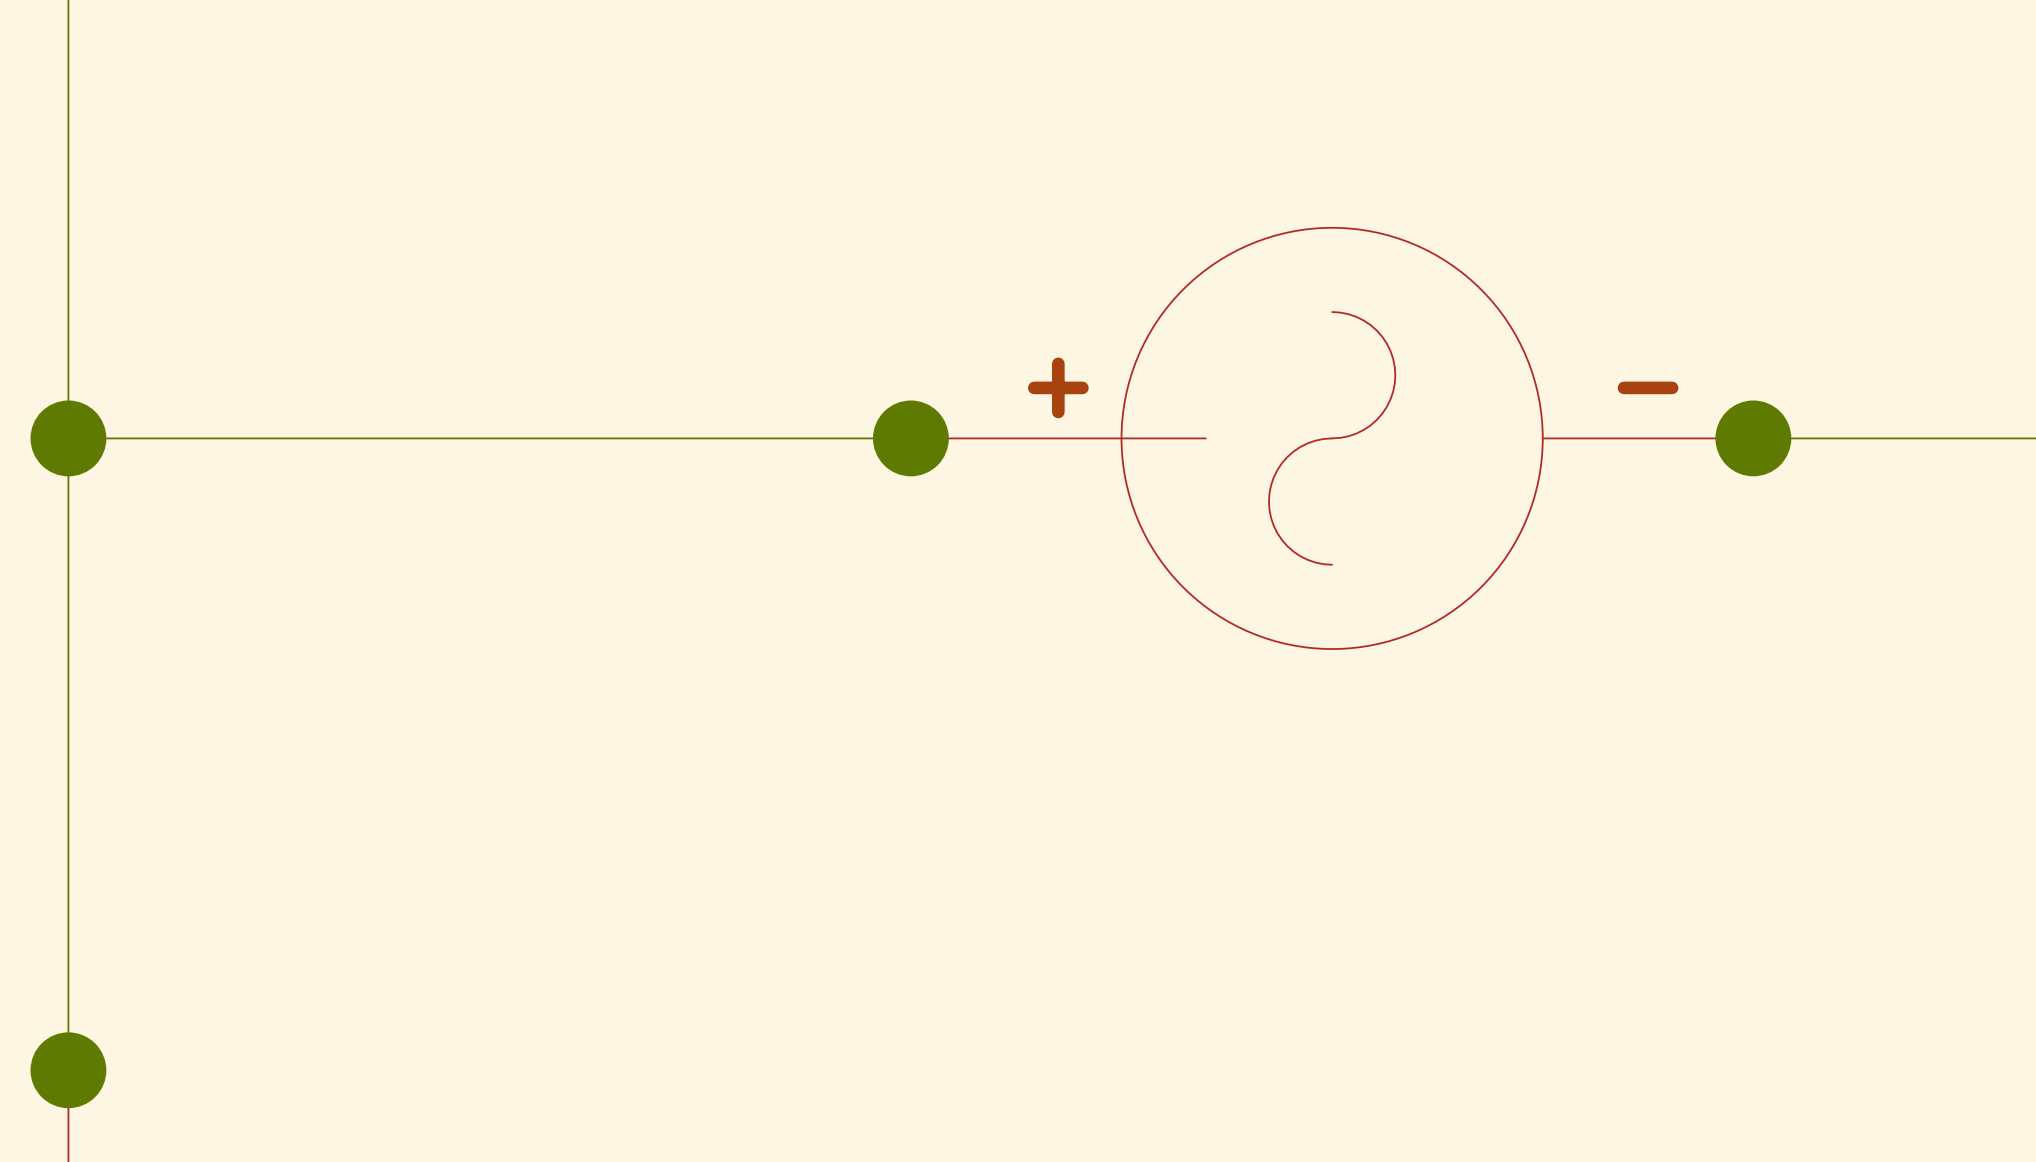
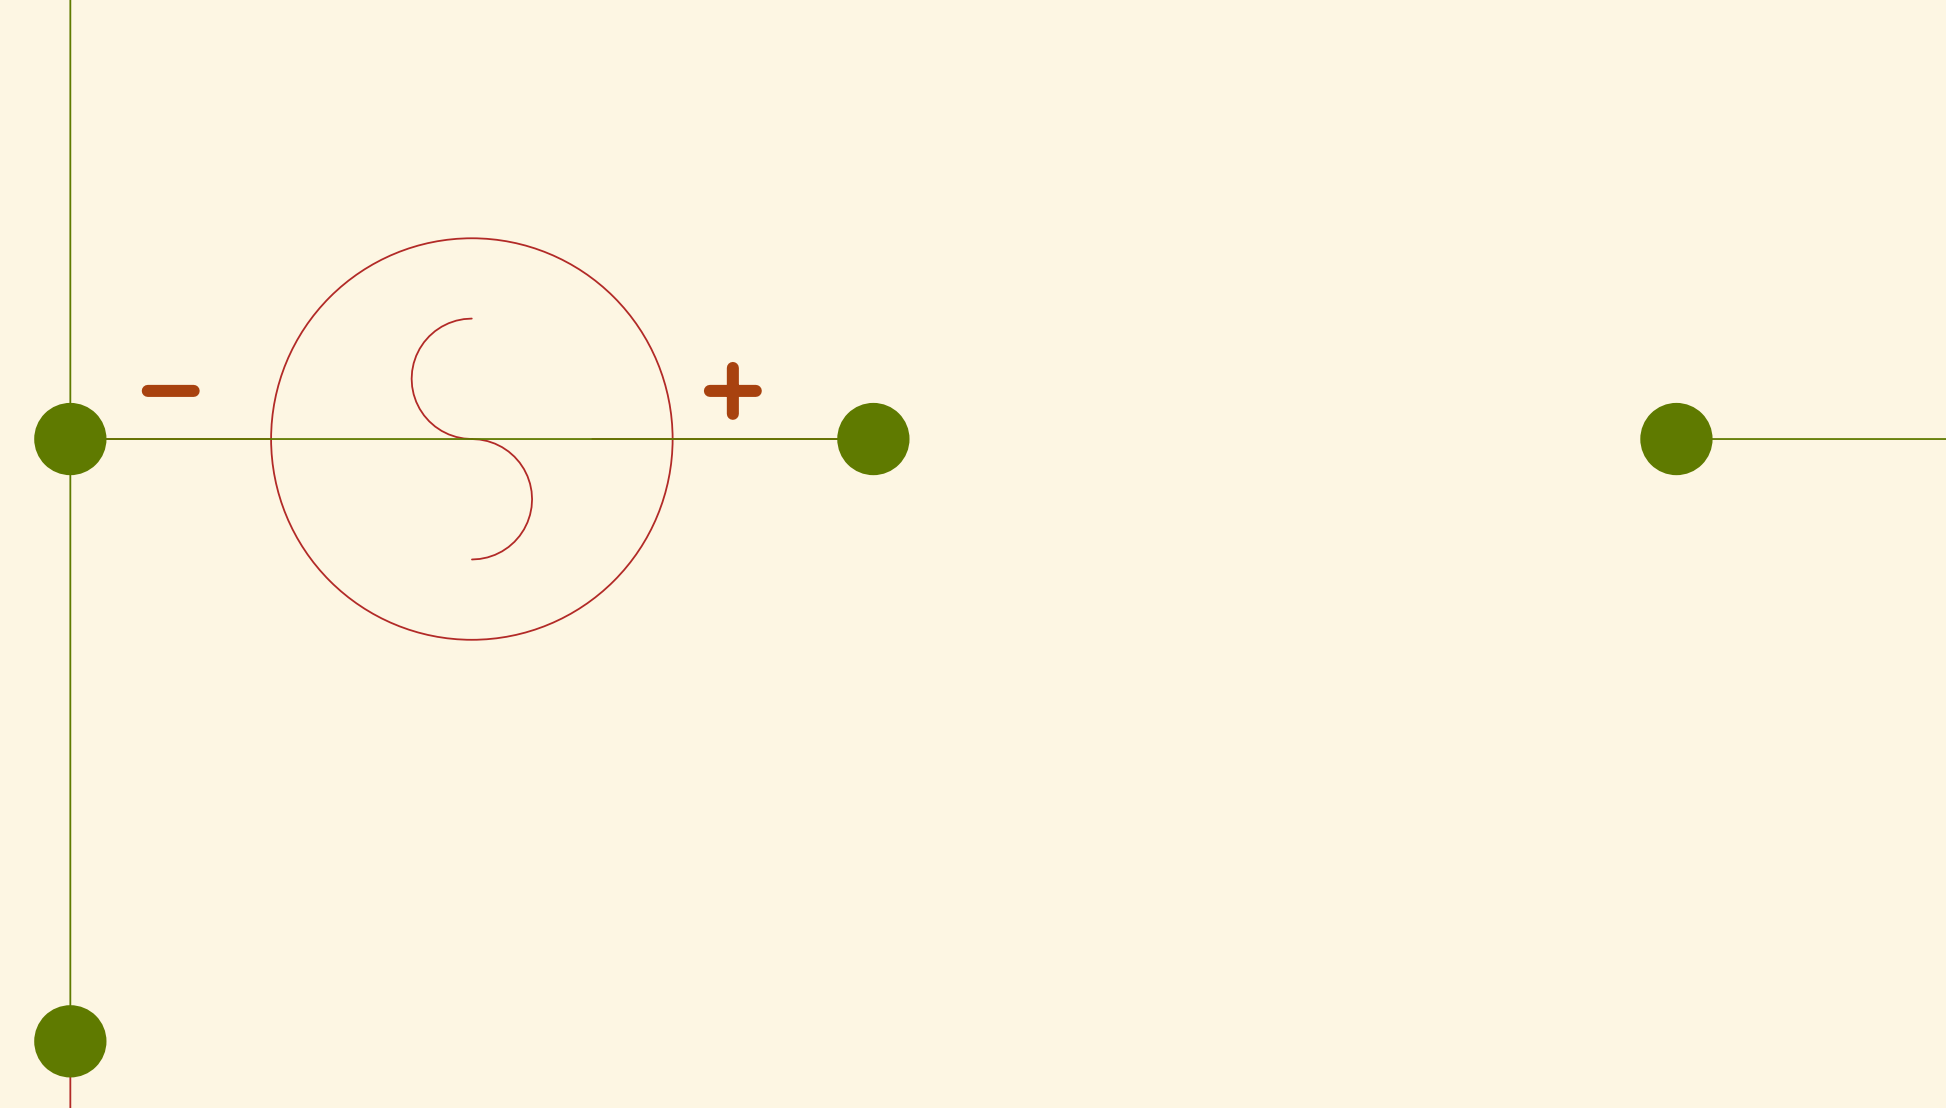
part: none -> (471, 439)
part: (1332, 438) -> none

